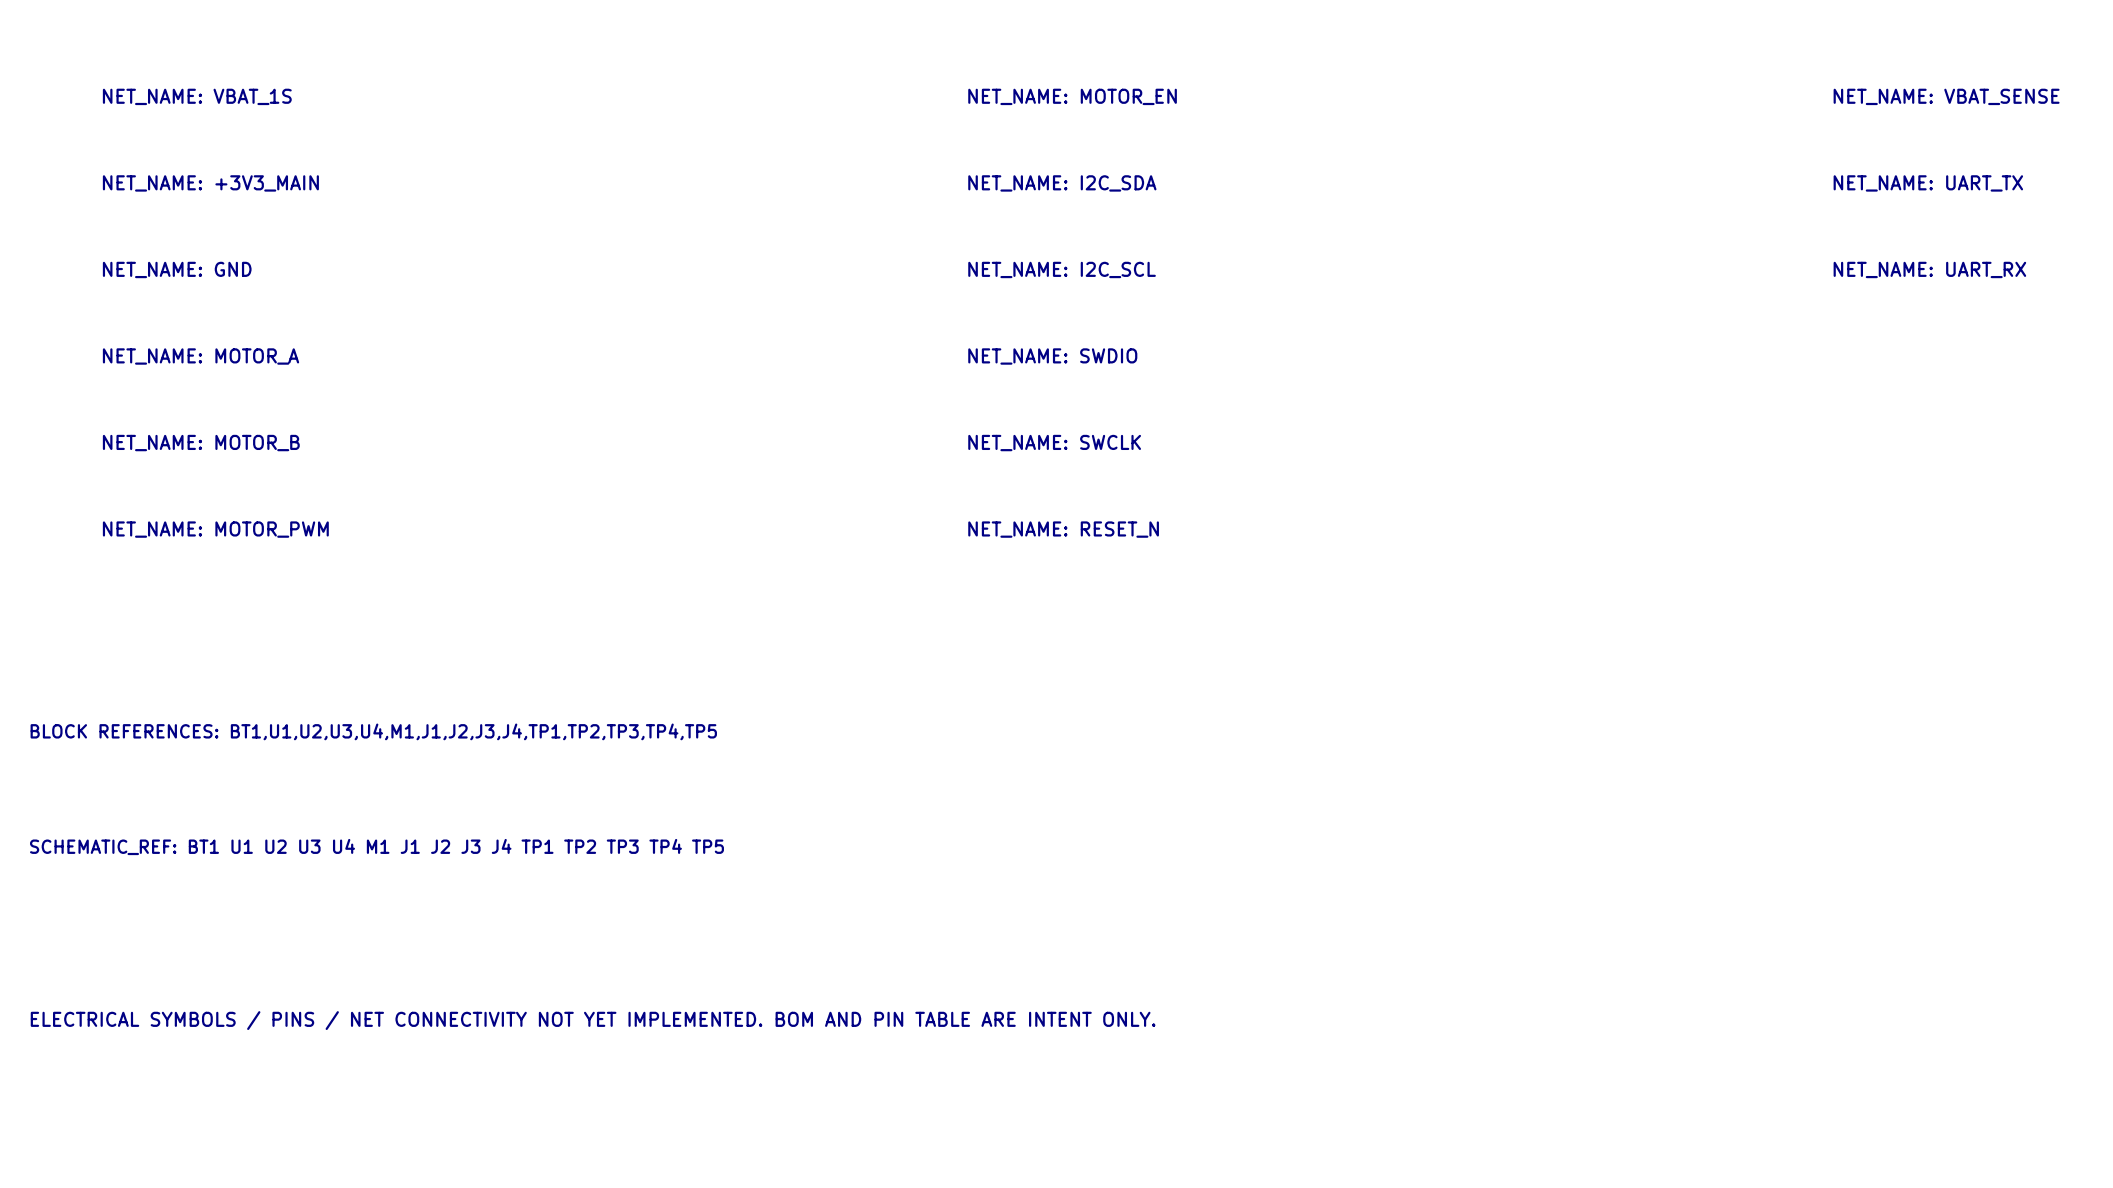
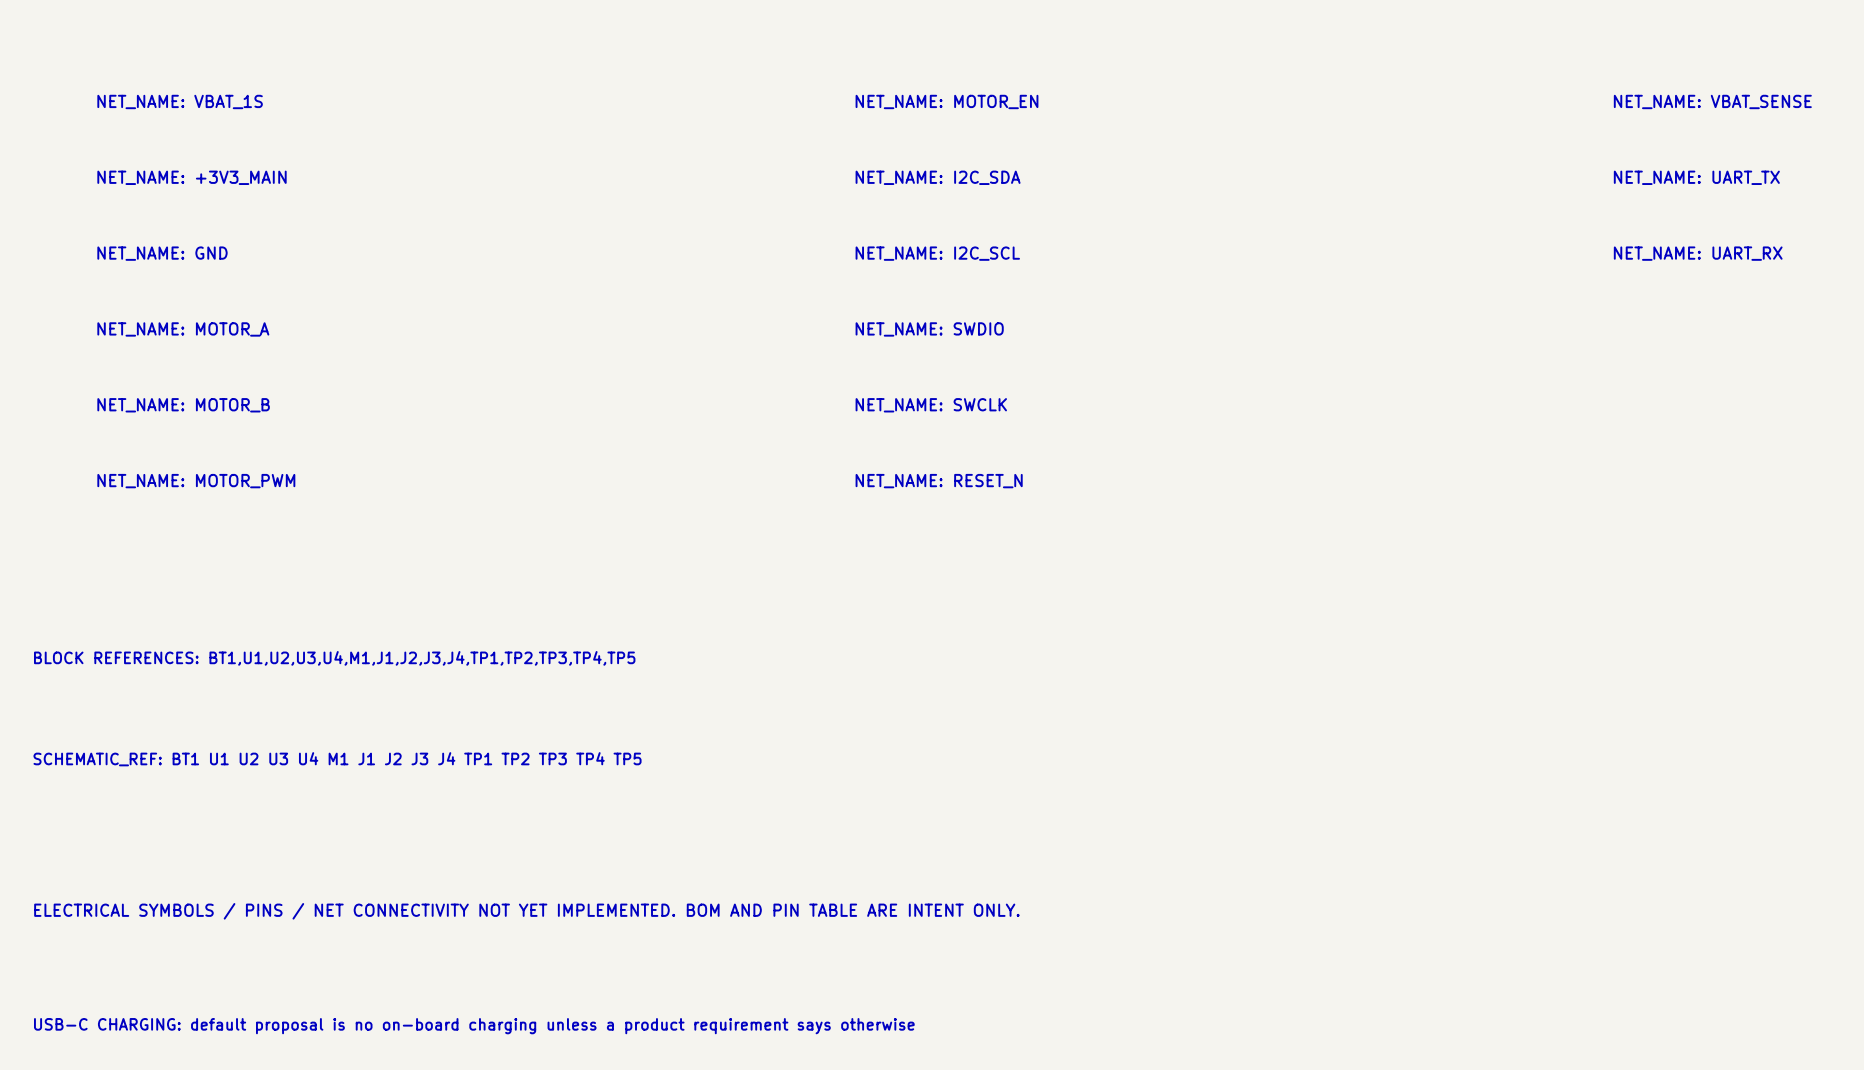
text: none -> USB-C CHARGING: default proposal is no on-board charging unless a product requirement says otherwise (474, 1026)

